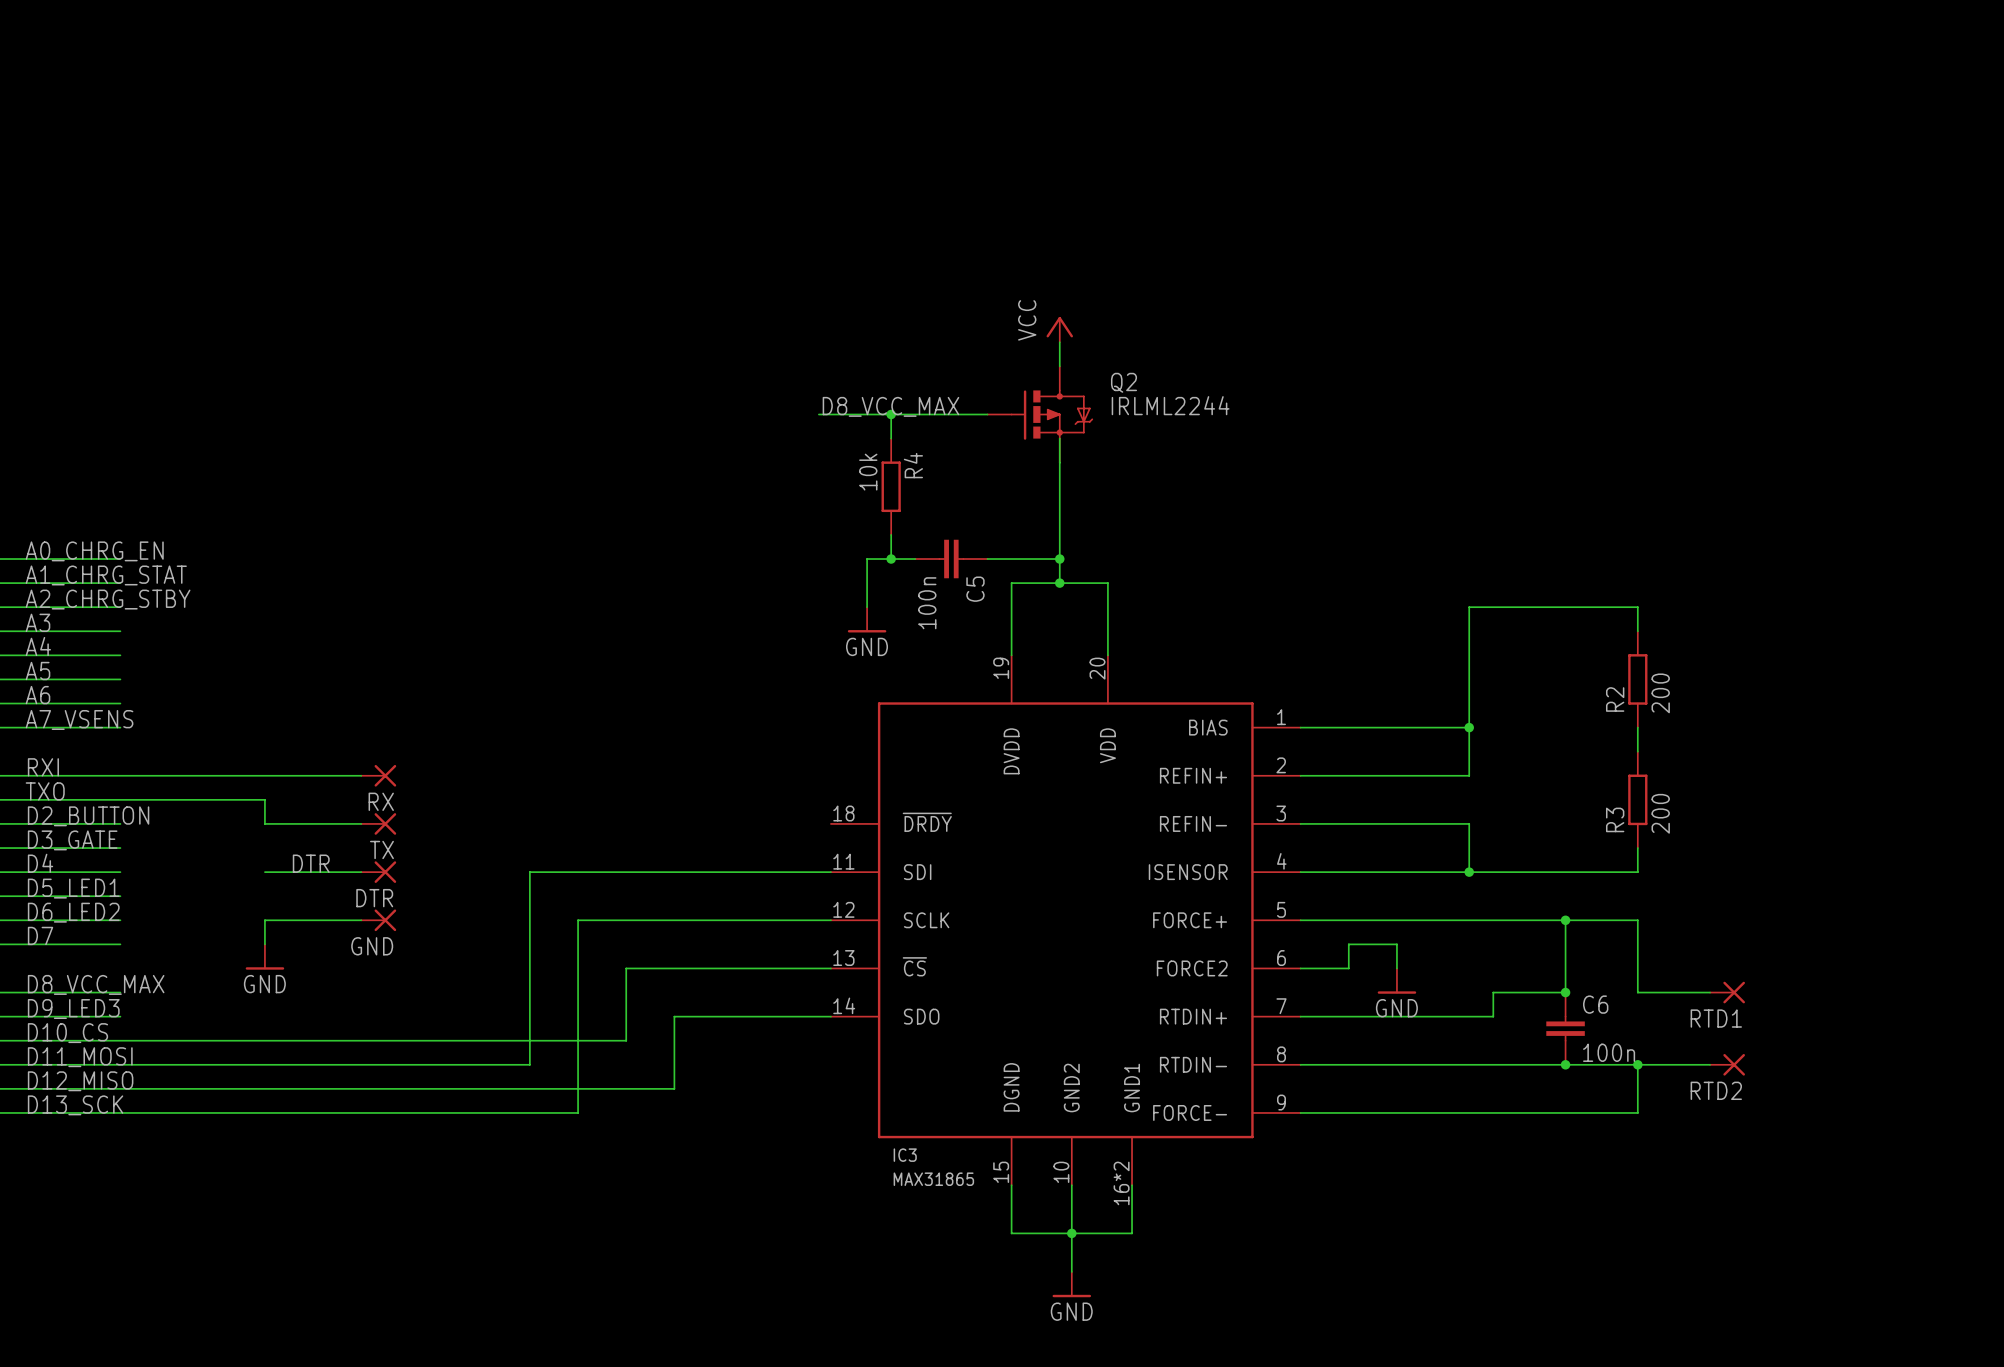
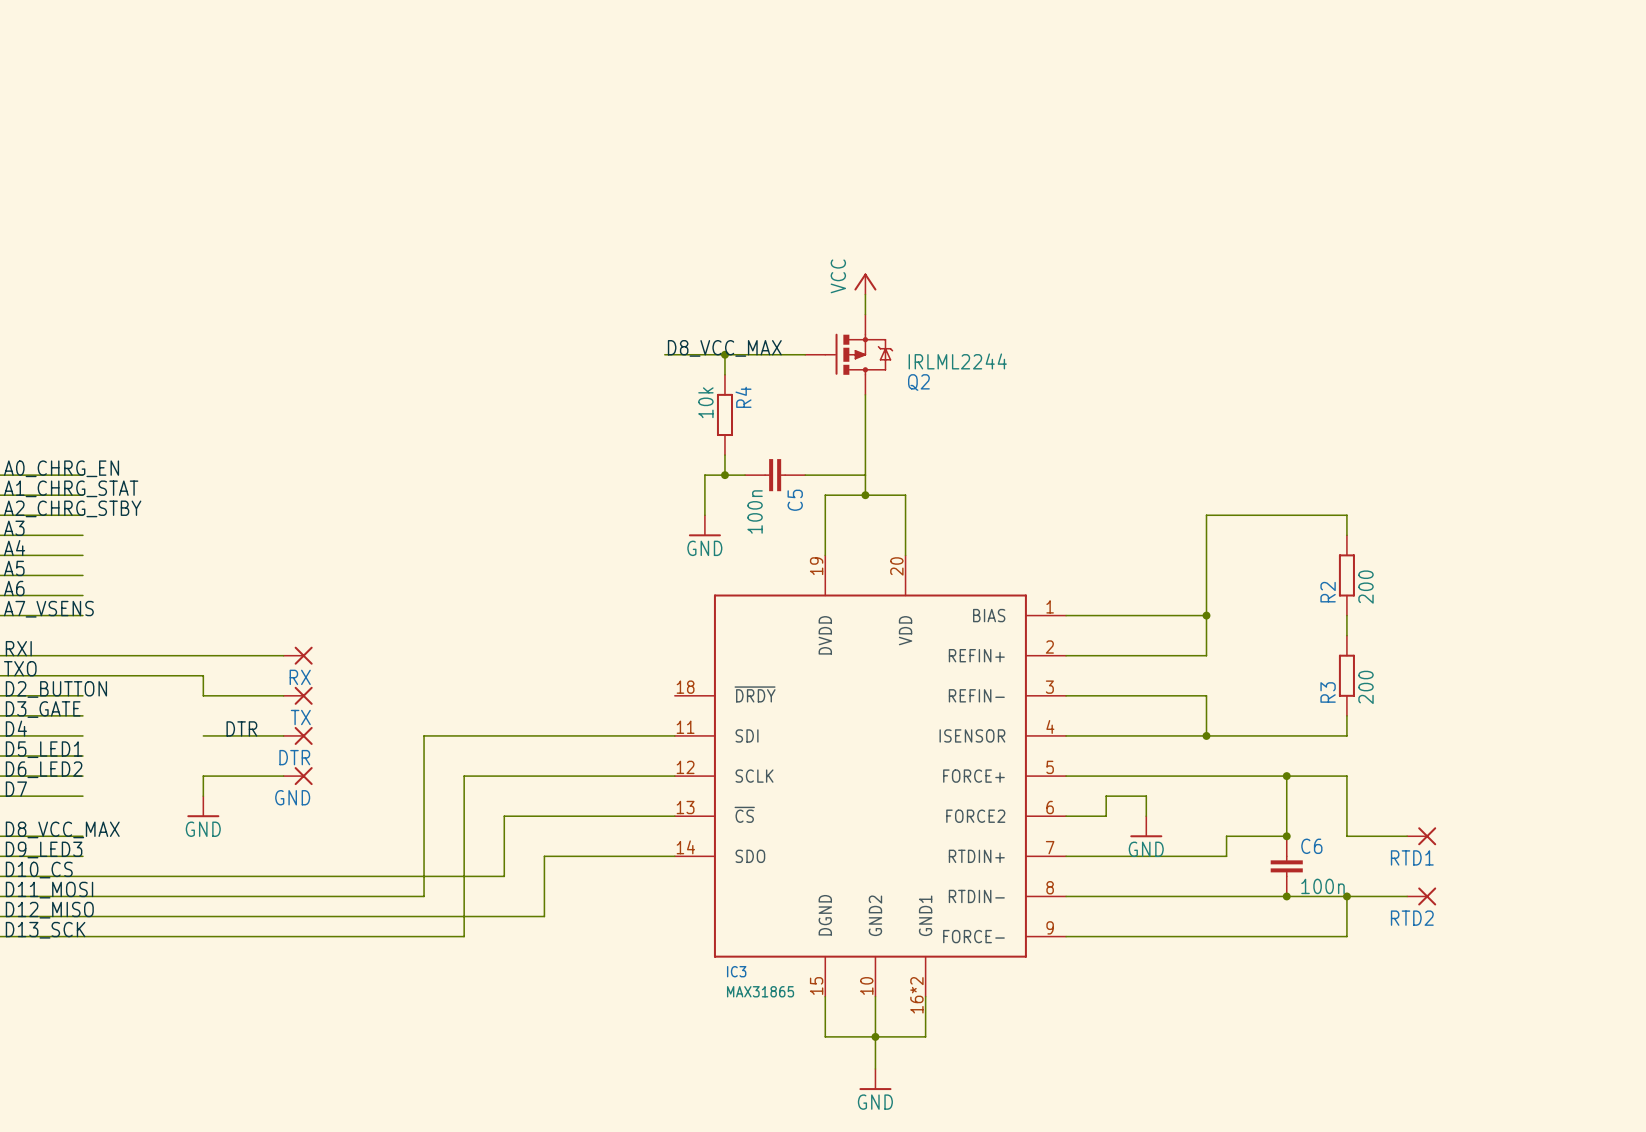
Q2 flip: as is (1051, 414) -> up-down (858, 354)
junction: (1059, 559) -> none

